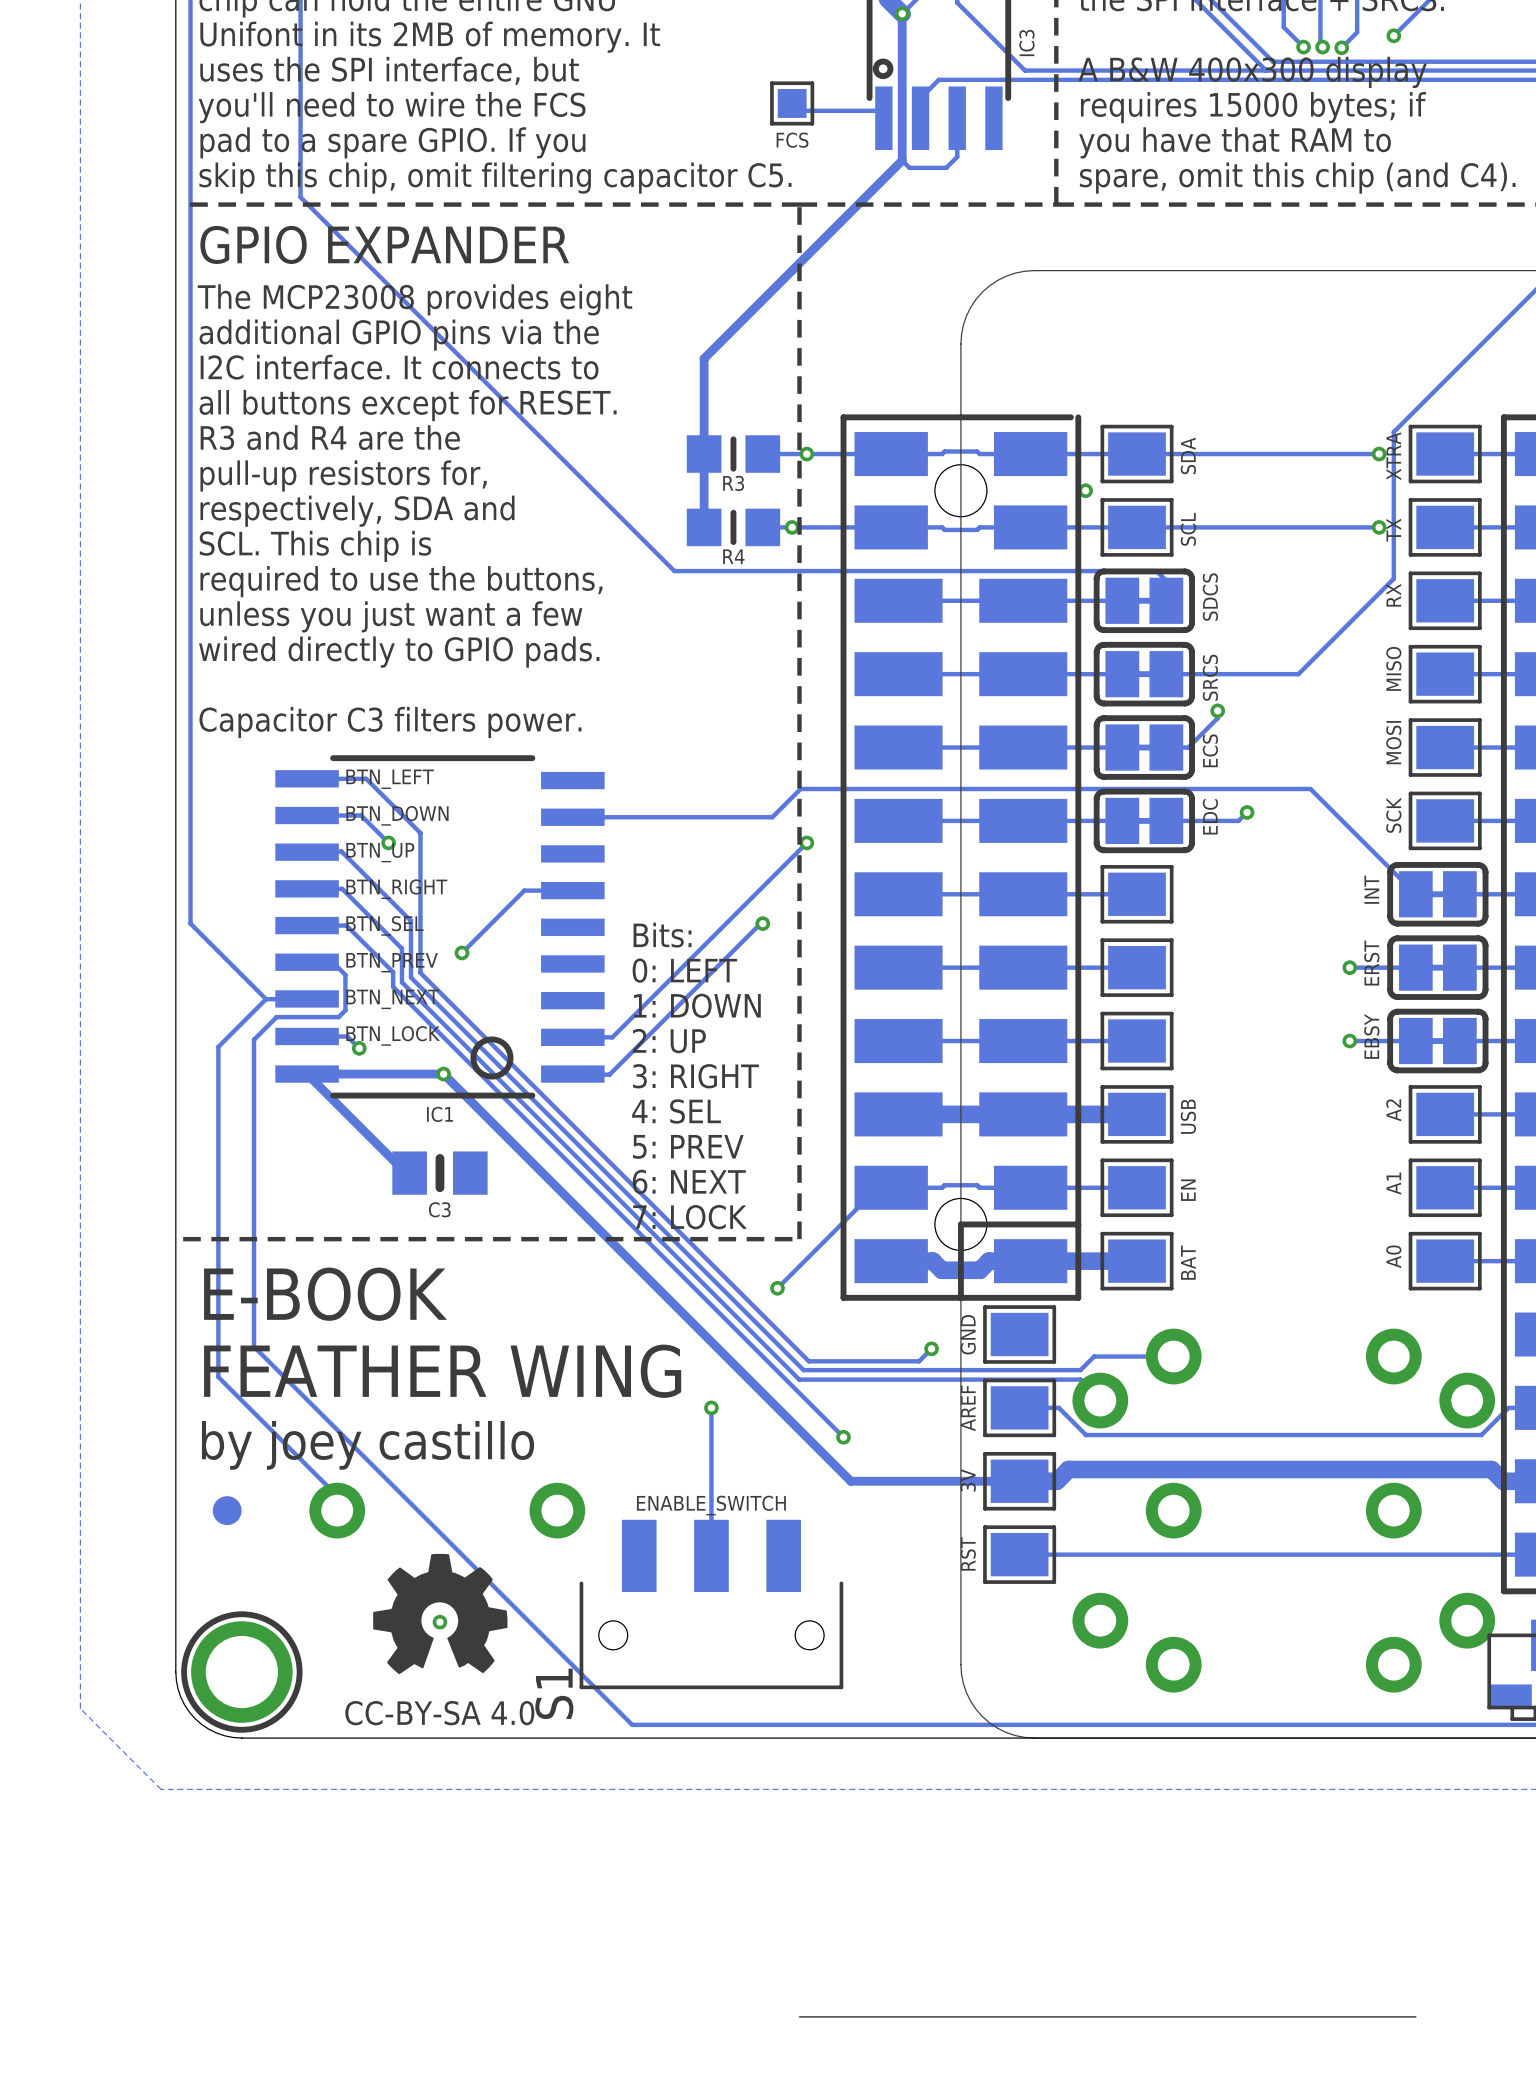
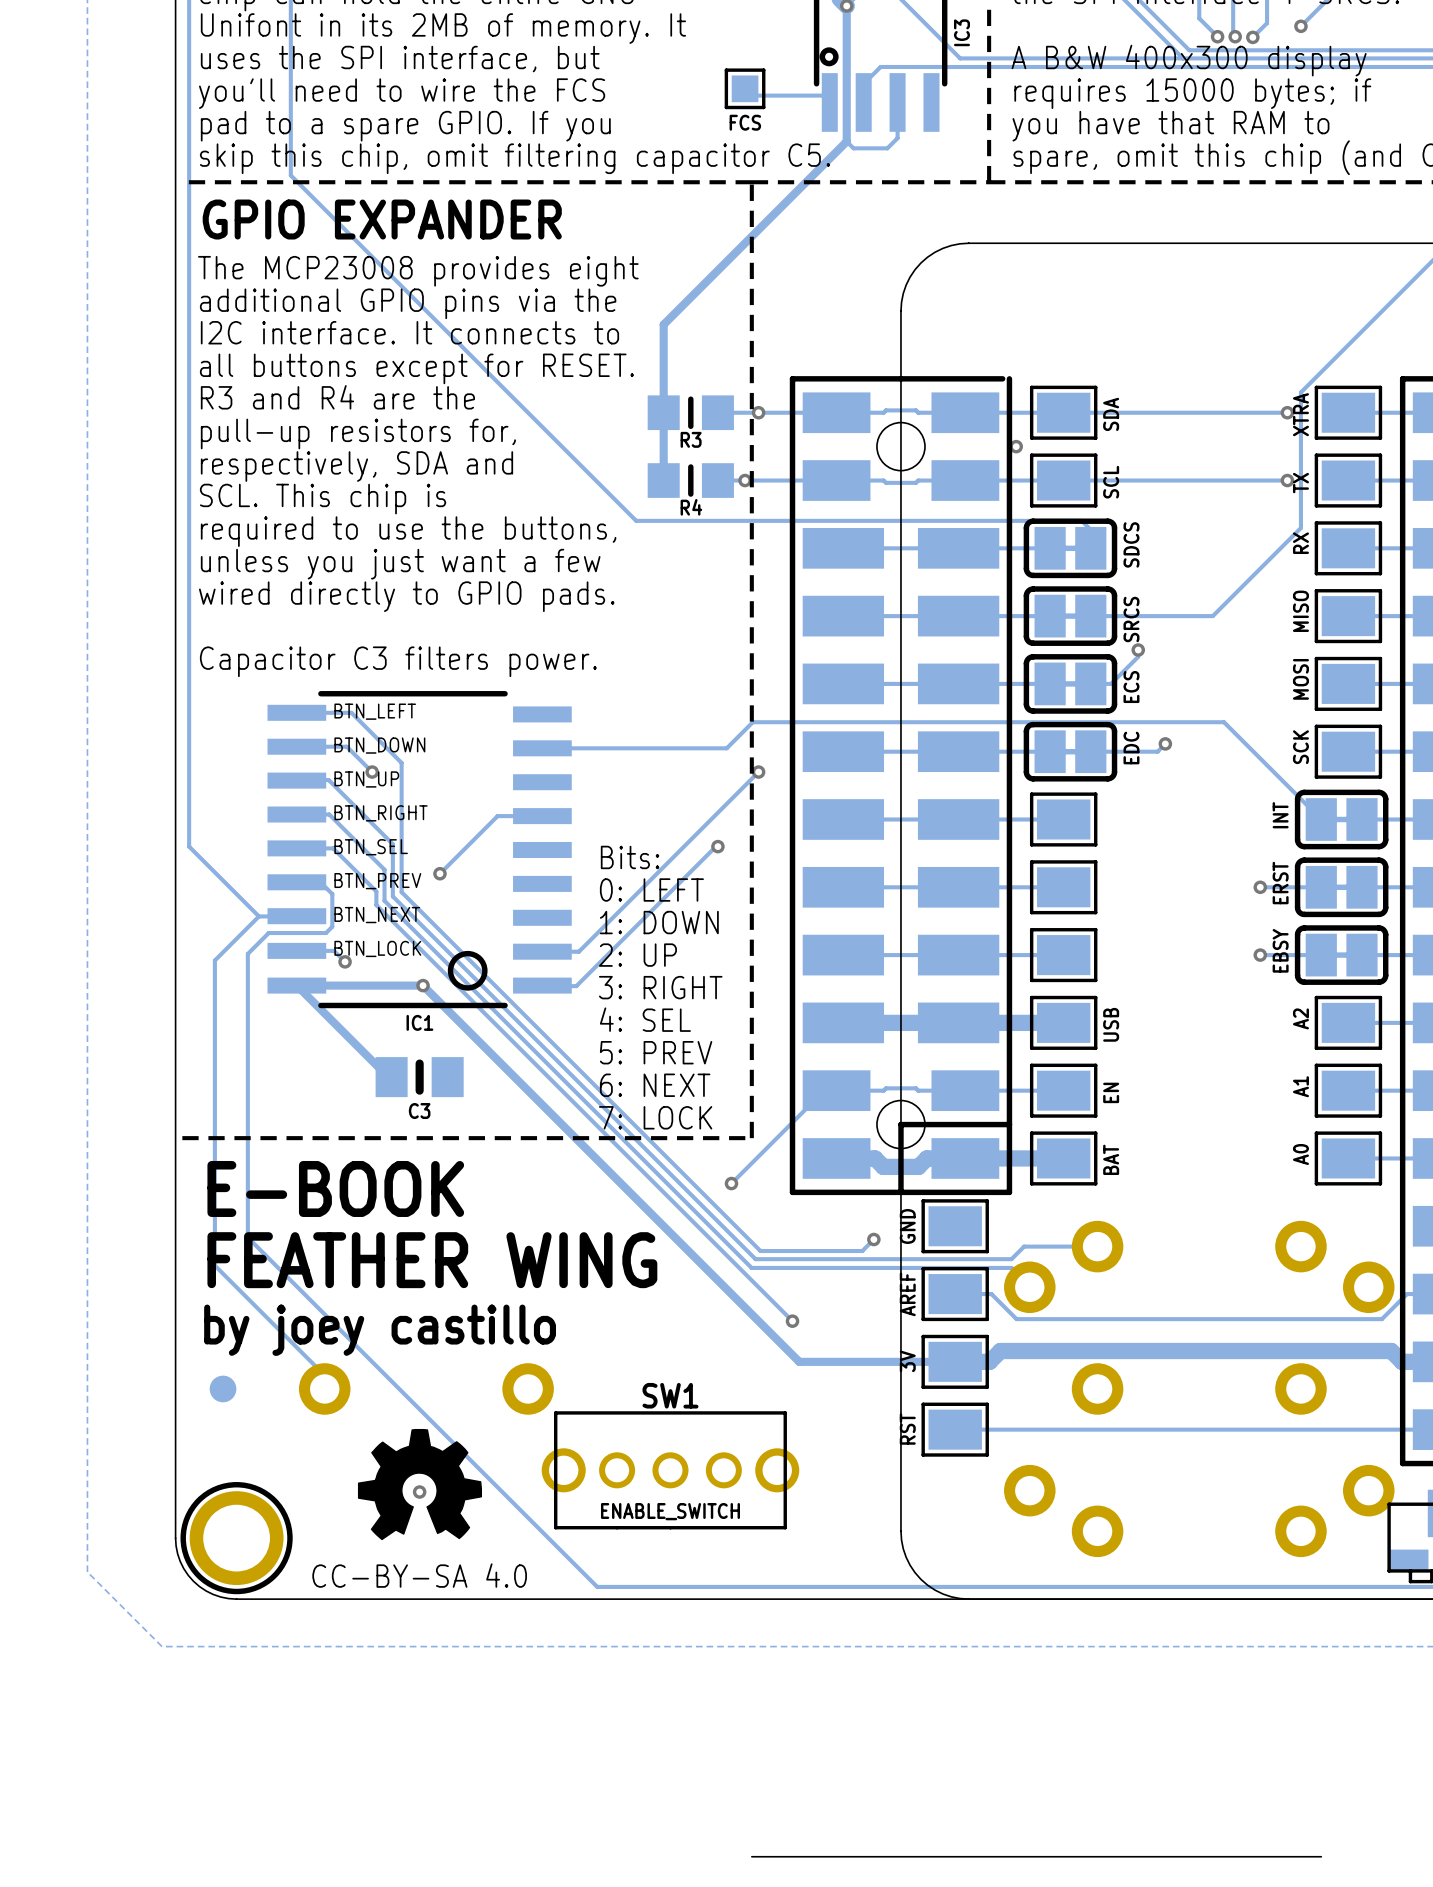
track: (711, 1407) (711, 1555) -> none
via: (711, 1407) -> none
text position: ENABLE_SWITCH (711, 1505) -> ENABLE_SWITCH (670, 1511)
SW1: none -> (670, 1470)
S1: (711, 1604) -> none

